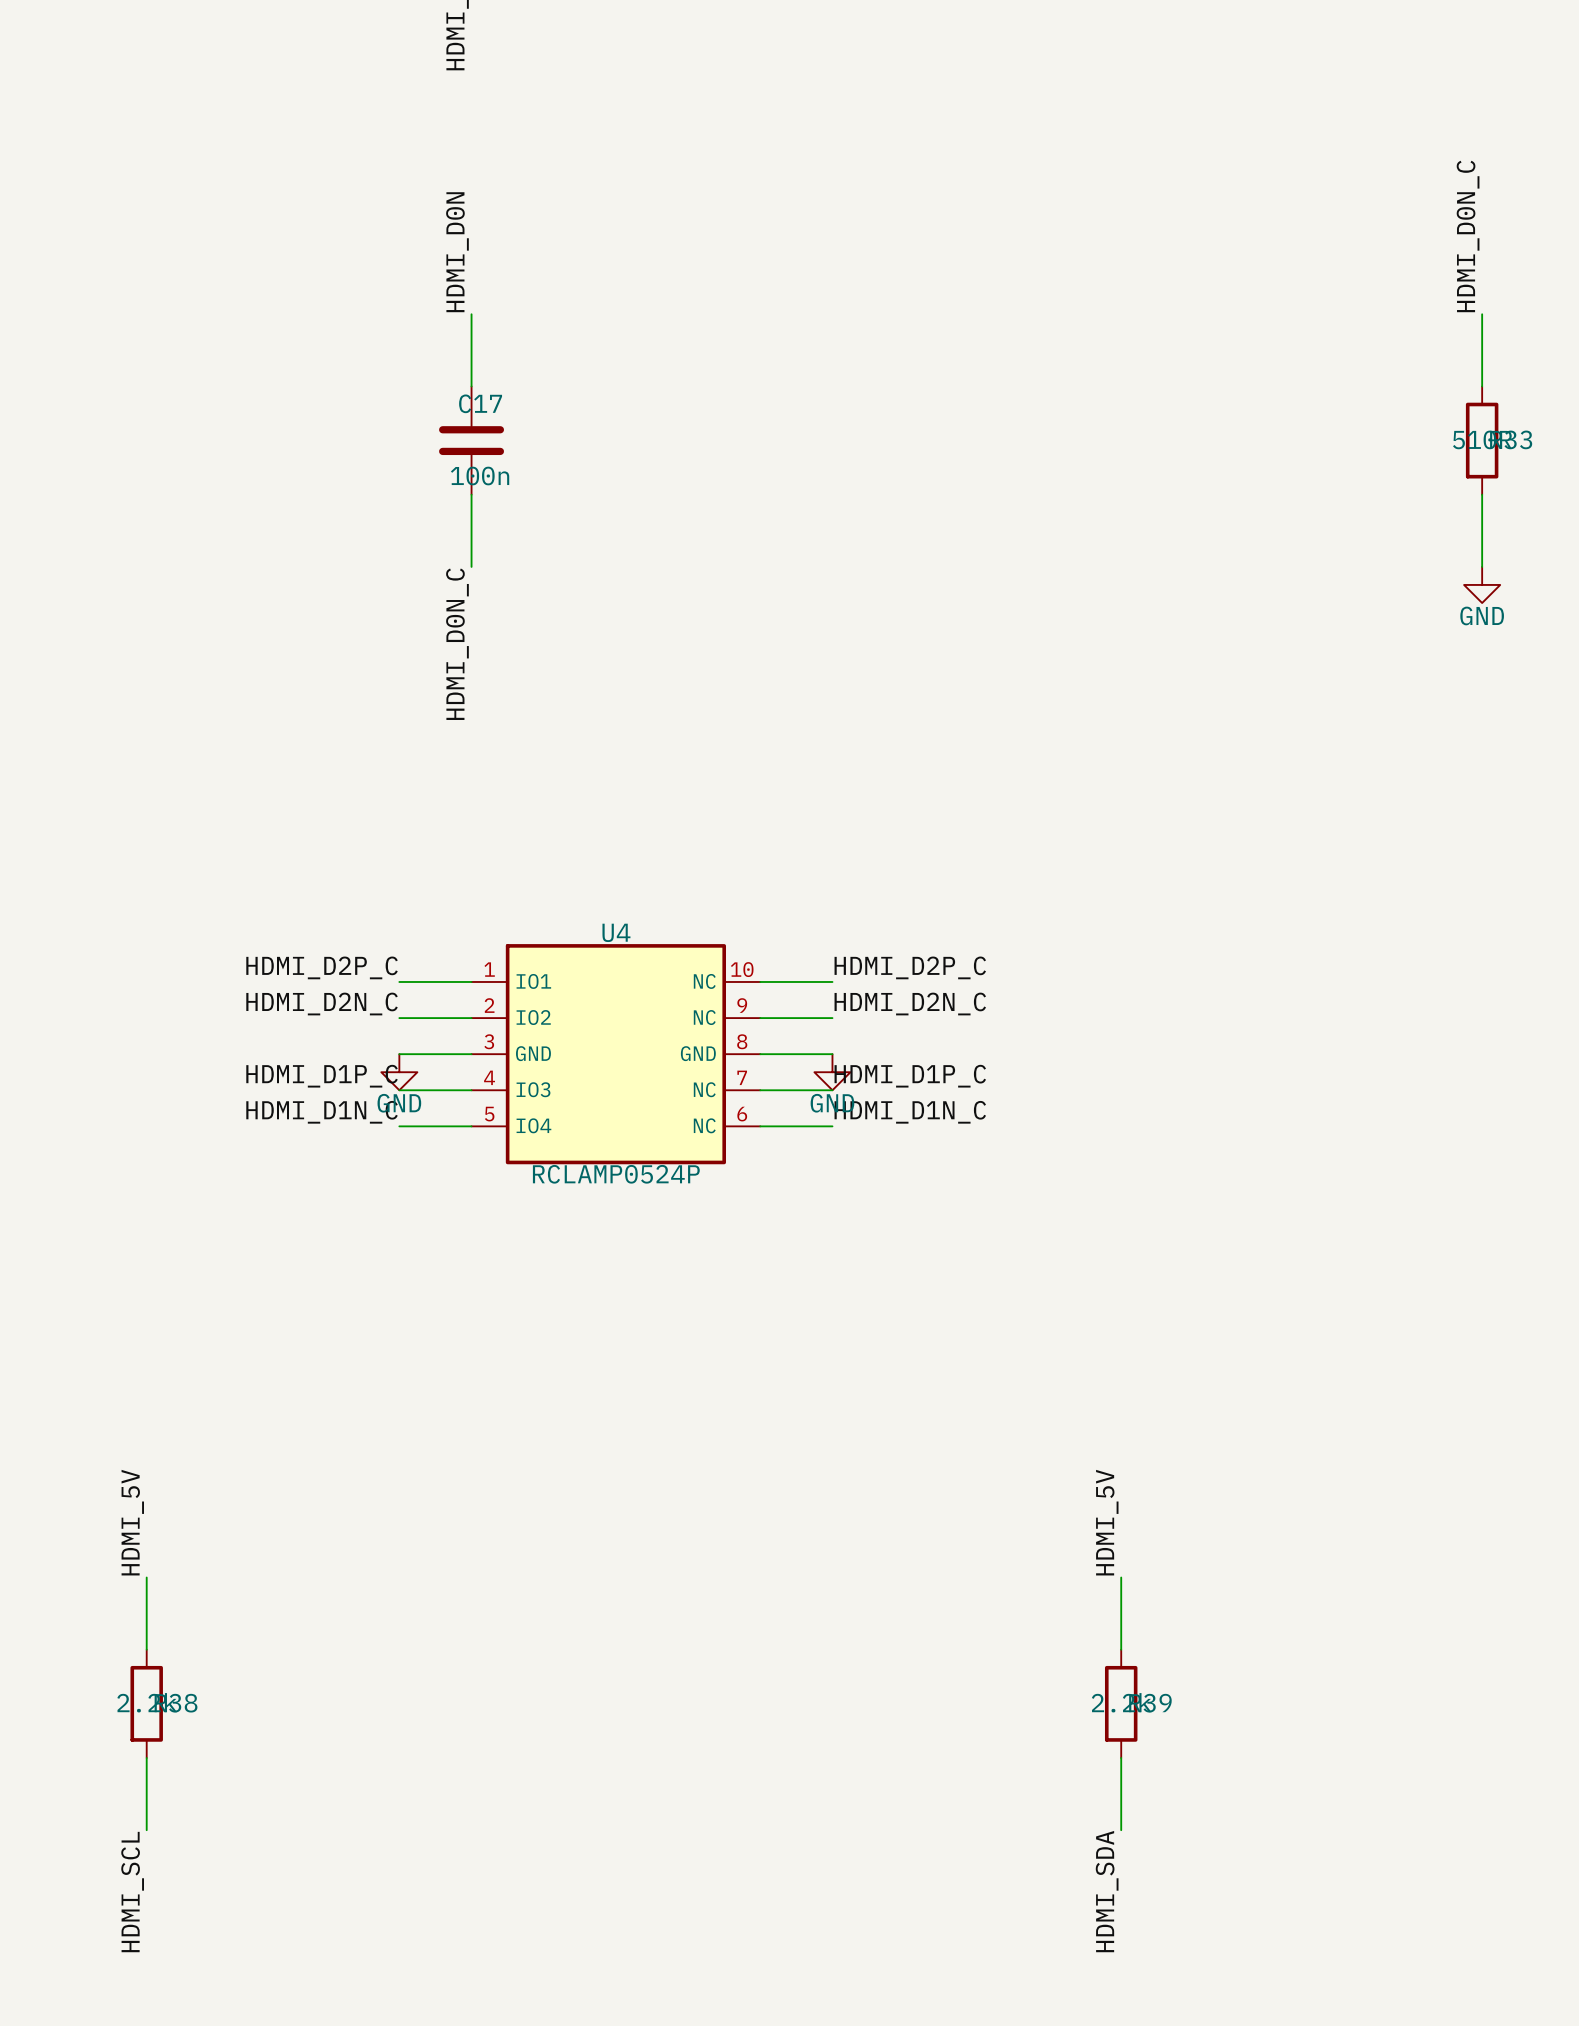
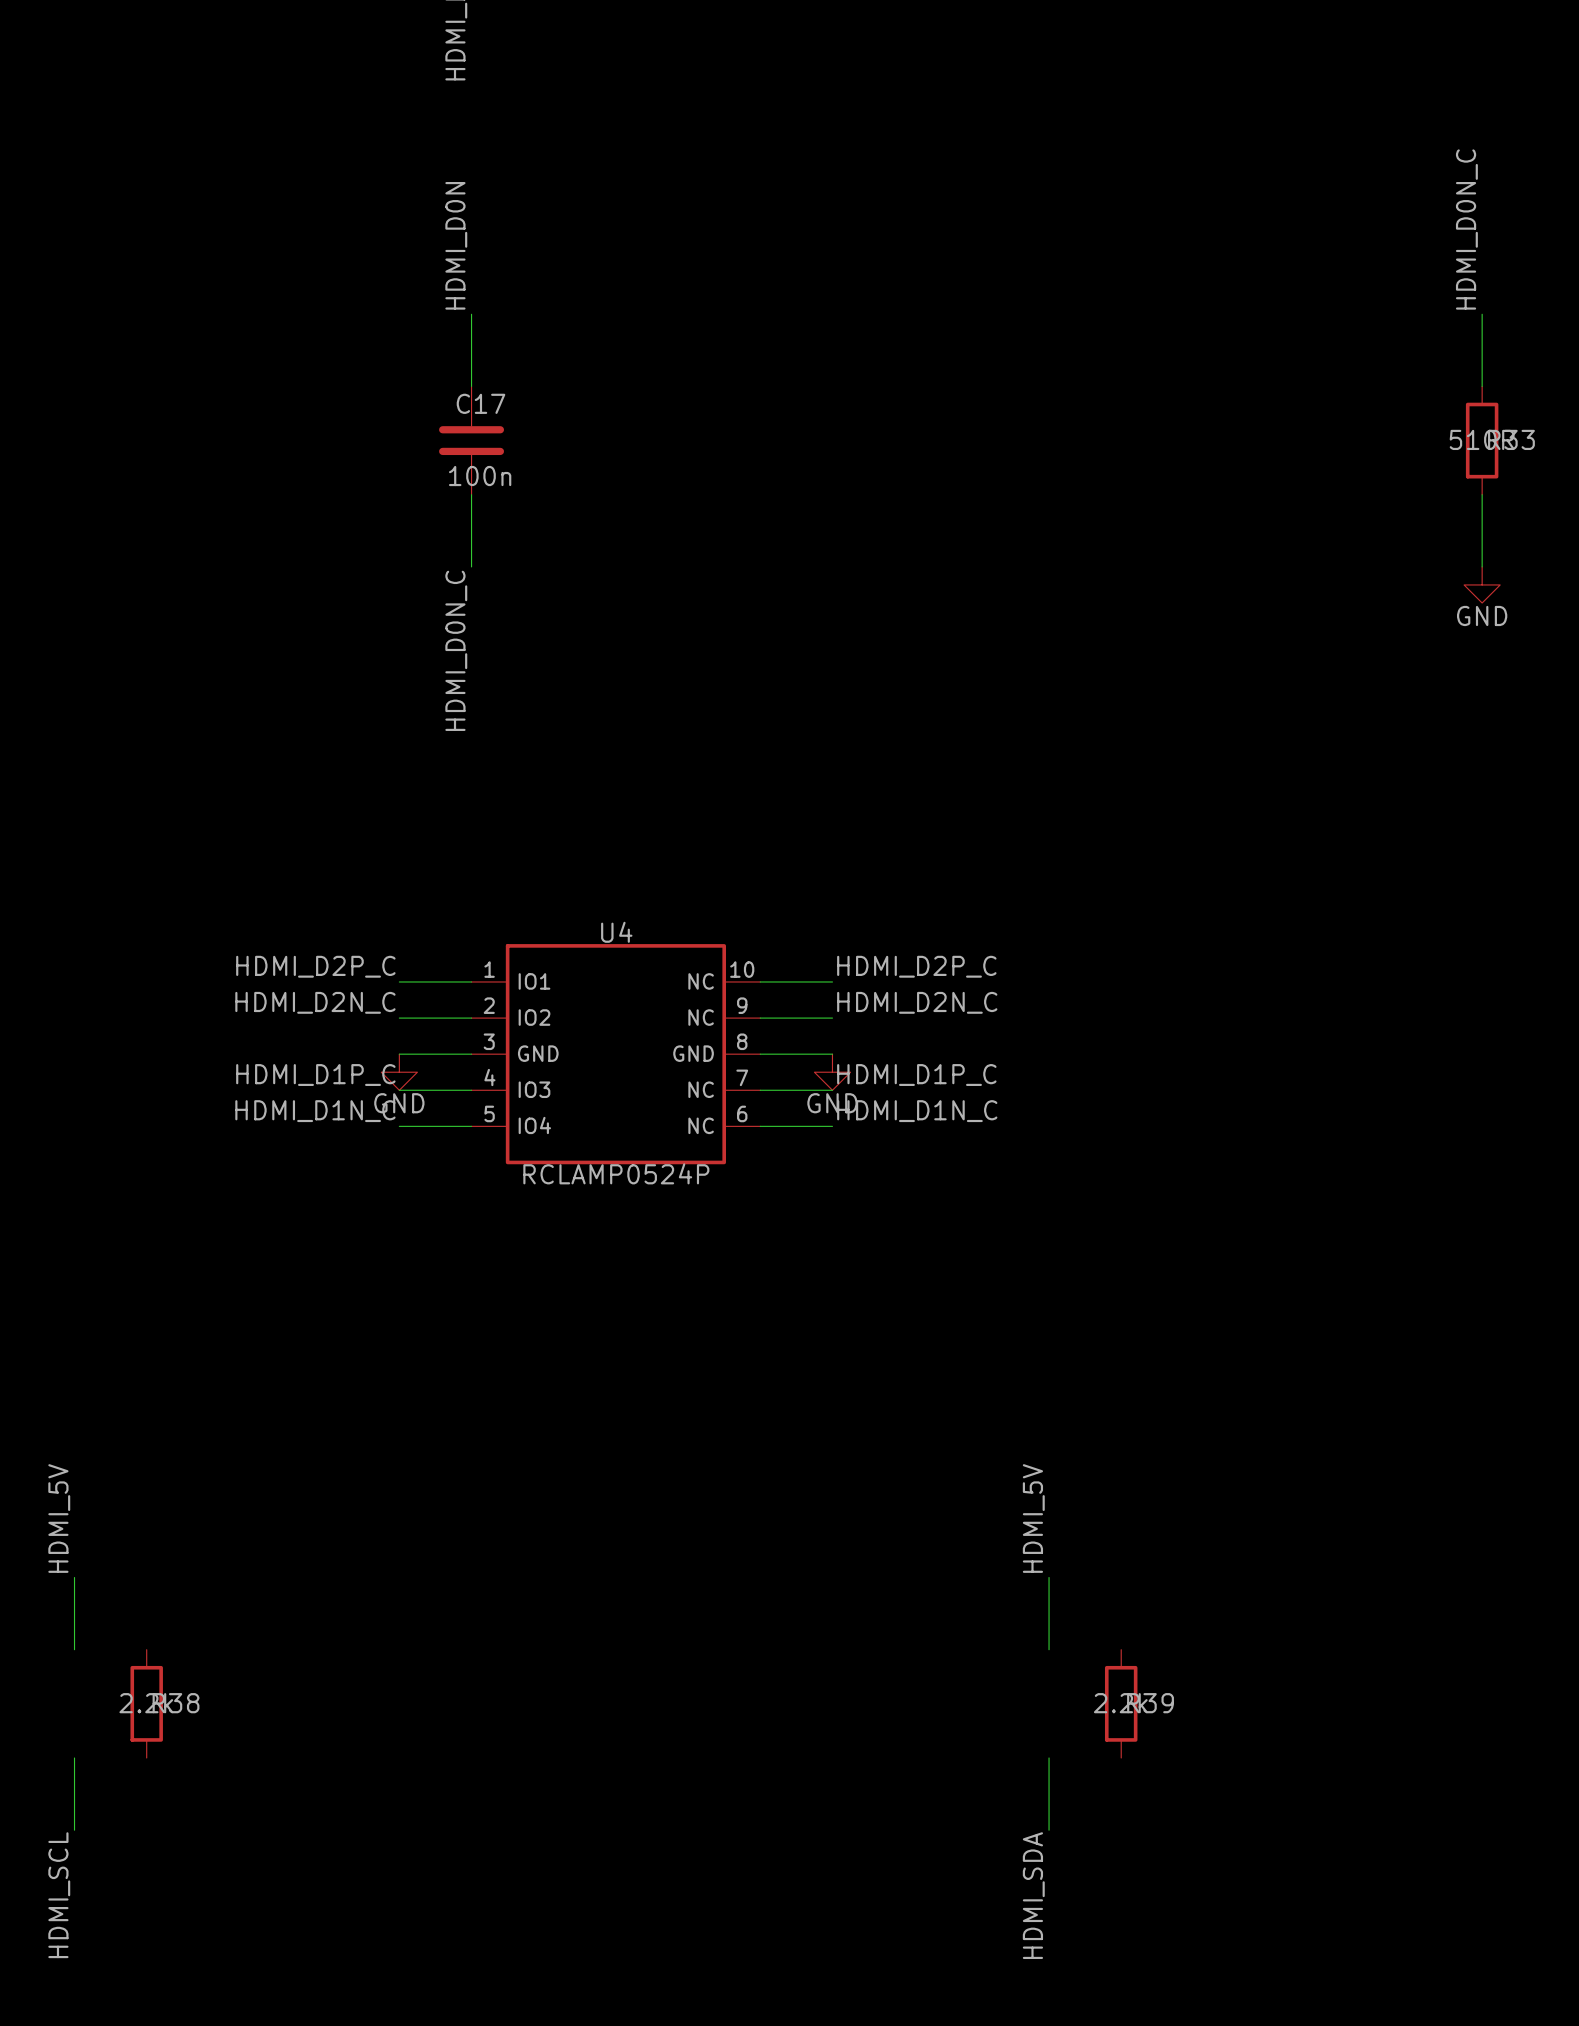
label position: HDMI_5V (132, 1522) -> HDMI_5V (59, 1518)
label position: HDMI_5V (1107, 1522) -> HDMI_5V (1033, 1518)
wire: (146, 1577) (146, 1649) -> (74, 1577) (74, 1649)
wire: (1121, 1577) (1121, 1649) -> (1049, 1577) (1049, 1649)
wire: (146, 1757) (146, 1830) -> (74, 1757) (74, 1830)
wire: (1121, 1757) (1121, 1830) -> (1049, 1757) (1049, 1830)
label position: HDMI_SDA (1107, 1891) -> HDMI_SDA (1033, 1895)
label position: HDMI_SCL (132, 1892) -> HDMI_SCL (59, 1895)

